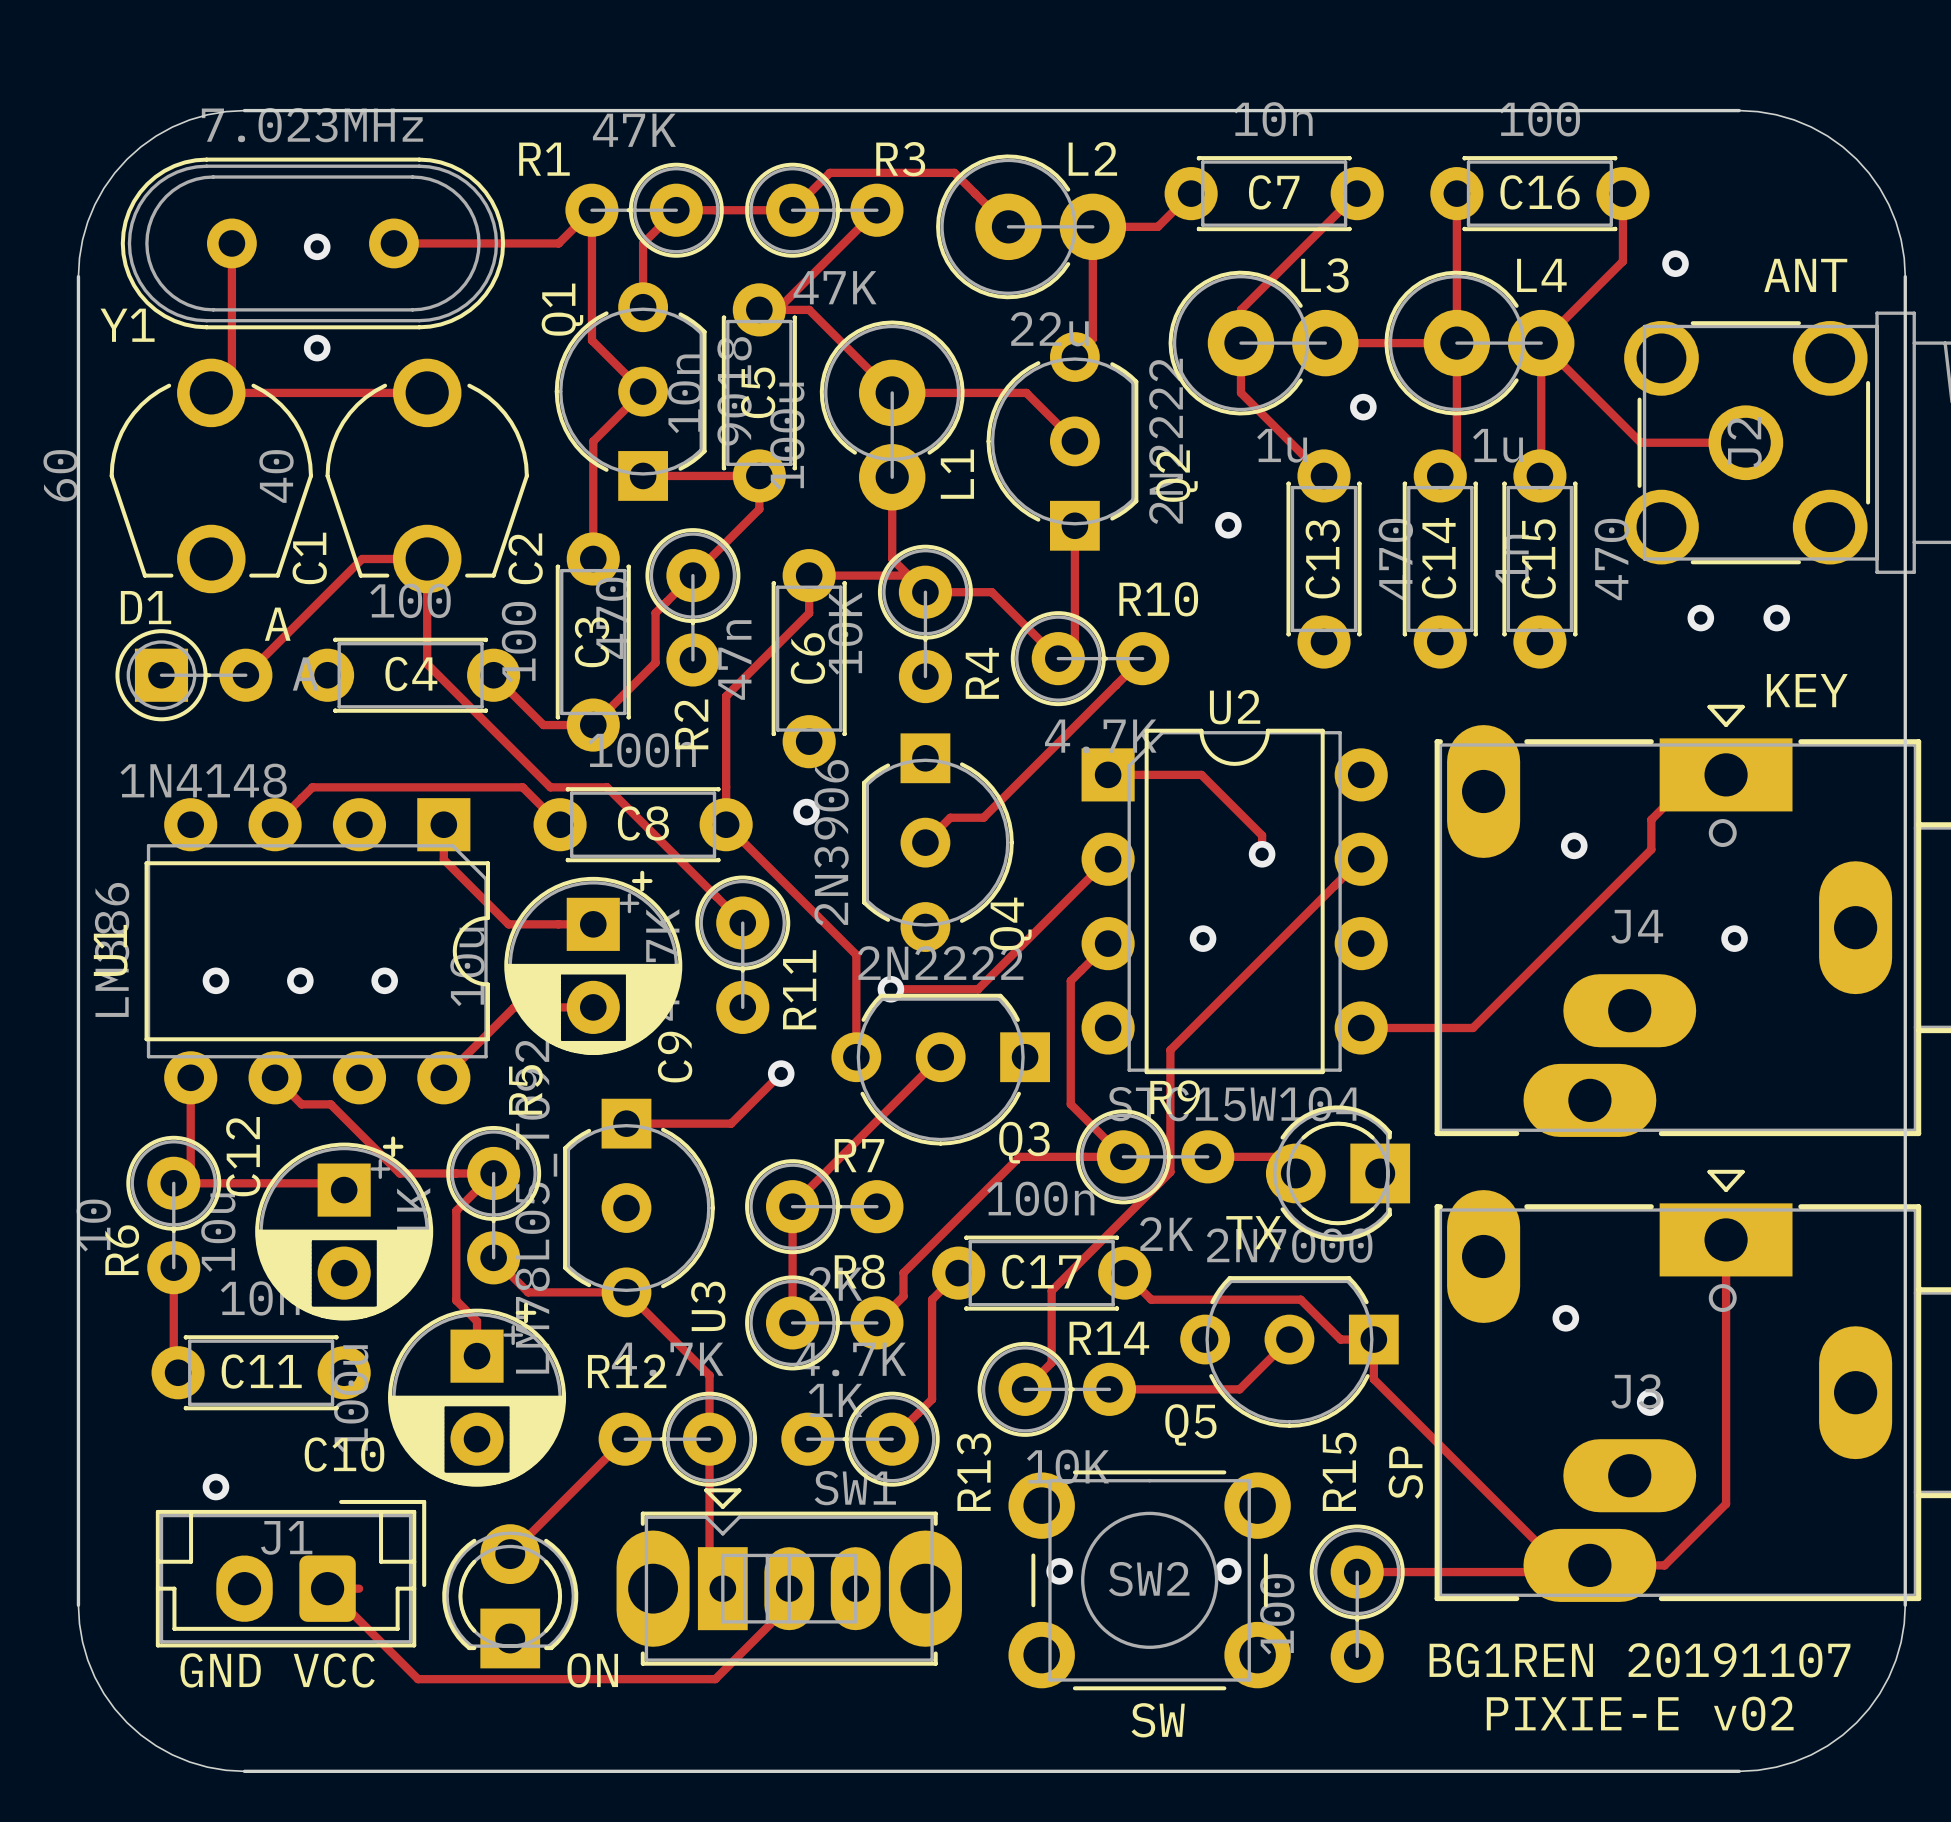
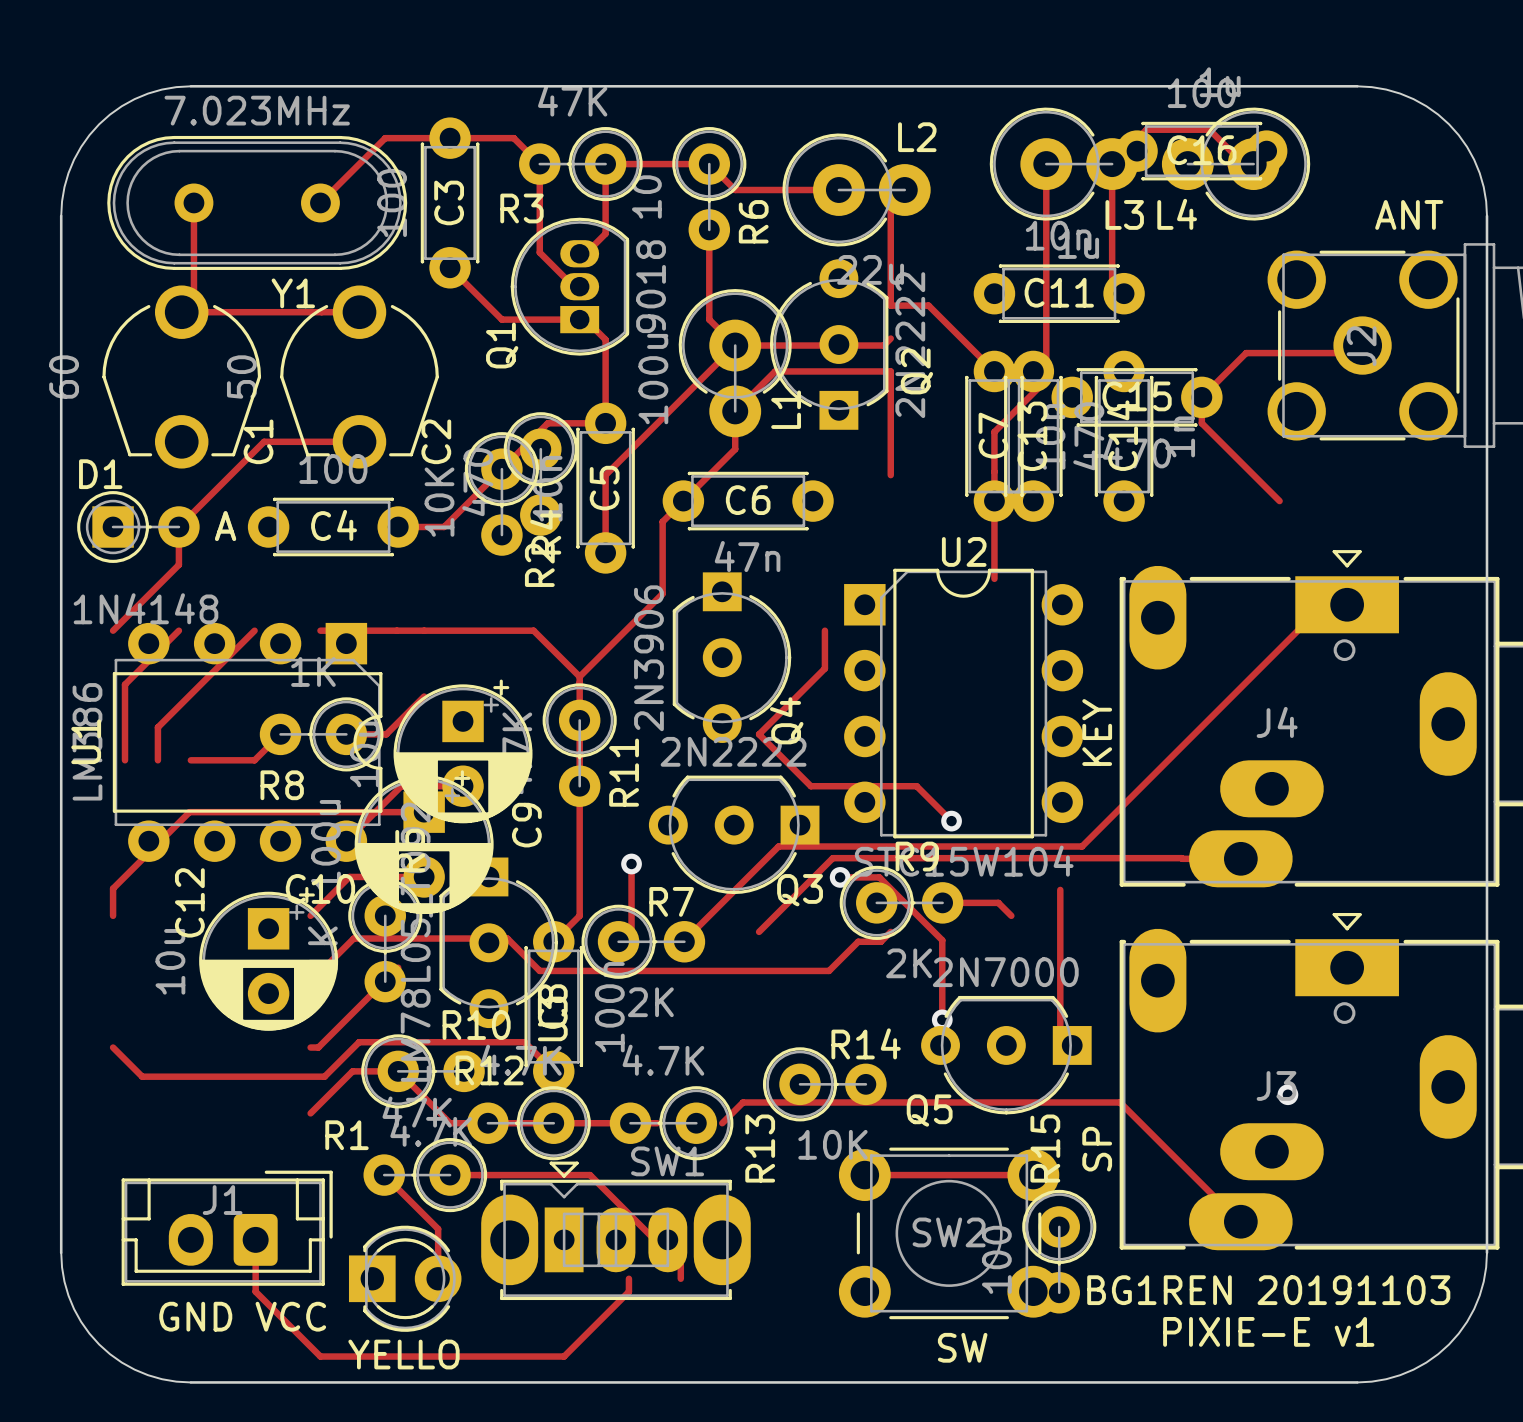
L2 name position: L2 (1092, 158) -> L2 (917, 137)
track: (1191, 193) (1157, 226) (1092, 226) (1092, 339) (1074, 357) -> none
C7 rotation: 0° (1274, 193) -> 90° clockwise (994, 436)
C7 position: (1274, 193) -> (994, 436)
track: (1357, 193) (1240, 309) (1240, 392) (1324, 475) -> none
track: (1456, 193) (1456, 459) (1440, 475) -> none
track: (1622, 193) (1622, 261) (1541, 343) -> none
R1 position: (644, 210) -> (425, 1175)
track: (775, 210) (676, 210) (643, 243) (643, 307) -> (605, 164) (605, 233) (585, 253) (579, 253)
track: (792, 210) (829, 172) (954, 172) (1008, 226) -> (618, 164) (709, 164) (735, 190) (838, 190)
R3 rotation: 0° (824, 210) -> 180° (580, 164)
track: (876, 210) (777, 309) -> none
track: none -> (1046, 164) (1046, 380) (994, 431) (994, 578)
track: none -> (1230, 165) (1235, 155) (1209, 129) (1146, 129) (1112, 164) (1112, 281) (1124, 293)
L2 position: (1031, 226) -> (856, 190)
track: (231, 243) (231, 372) (211, 392) (427, 392) -> none
Y1 position: (312, 243) -> (257, 202)
track: (393, 243) (558, 243) (591, 210) (591, 340) (643, 391) (593, 441) (593, 558) -> none
track: none -> (904, 190) (890, 204) (890, 305) (928, 305) (994, 371)
via: (317, 246) -> none
track: none -> (193, 202) (193, 299) (181, 312) (359, 312)
track: none -> (320, 202) (385, 138) (513, 138) (539, 164) (539, 252) (573, 286) (579, 286)
via: (1675, 263) -> none
L3 name position: L3 (1324, 275) -> L3 (1124, 214)
Q1 footprint: [554, 282, 707, 501] -> [510, 217, 630, 356]
track: none -> (709, 229) (709, 319) (735, 345)
Q1 name position: Q1 (562, 309) -> Q1 (502, 345)
track: (759, 309) (809, 309) (892, 392) (1026, 392) (1074, 441) -> none
Y1 name position: Y1 (127, 325) -> Y1 (293, 293)
track: none -> (450, 267) (501, 319) (585, 319) (605, 339) (605, 423) (547, 423) (444, 527) (398, 527)
L3 position: (1263, 343) -> (1063, 164)
track: (1325, 343) (1456, 343) -> none
L4 rotation: 0° (1479, 343) -> 180° (1236, 164)
L4 position: (1479, 343) -> (1236, 164)
track: (1541, 343) (1640, 442) (1745, 442) -> none
track: (1541, 343) (1539, 475) -> none
via: (317, 348) -> none
C5 position: (759, 392) -> (605, 488)
via: (1363, 407) -> none
L1 position: (892, 415) -> (735, 363)
track: none -> (890, 338) (883, 345) (735, 345)
track: none -> (735, 345) (605, 475) (605, 552)
track: none -> (1361, 353) (1246, 353) (1201, 397) (1201, 423) (1279, 501)
C1 position: (211, 475) -> (181, 377)
C2 position: (427, 475) -> (359, 377)
track: (643, 475) (759, 475) (759, 509) (655, 612) (655, 662) (593, 725) (543, 725) (493, 675) -> none
C2 value: 40 (276, 476) -> 50 (241, 377)
track: (892, 477) (892, 558) (925, 592) (991, 592) (1058, 658) (1074, 642) (1074, 525) -> none
via: (1228, 525) -> none
C15 rotation: 0° (1539, 558) -> 90° clockwise (1137, 397)
track: none -> (359, 441) (264, 441) (178, 527) (178, 564) (113, 630)
track: (908, 575) (809, 575) (809, 613) (726, 696) (726, 824) (856, 954) (856, 1057) -> none
track: none -> (890, 475) (890, 371) (775, 371) (735, 411) (735, 449) (662, 521) (662, 593) (579, 676)
via: (1700, 618) -> none
via: (1776, 618) -> none
R4 position: (925, 623) -> (501, 493)
D1 footprint: [115, 629, 273, 722] -> [77, 491, 200, 563]
C3 position: (593, 642) -> (450, 202)
C6 rotation: 0° (809, 658) -> 90° clockwise (748, 501)
C6 position: (809, 658) -> (748, 501)
R10 position: (1090, 658) -> (422, 1071)
track: (1142, 658) (983, 817) (950, 817) (925, 842) -> none
C6 value position: 47n (734, 660) -> 47n (747, 556)
track: (245, 675) (362, 558) (427, 558) (427, 664) (550, 787) (607, 787) (742, 923) -> none
C4 position: (410, 675) -> (333, 527)
J4 value rotation: 0° (1807, 690) -> 90° counterclockwise (1097, 732)
J4 value position: KEY (1807, 690) -> KEY (1097, 732)
track: (1108, 774) (1201, 774) (1262, 835) (1262, 854) -> none
track: none -> (178, 630) (125, 684) (125, 760)
track: none -> (254, 630) (157, 727) (157, 760)
track: none -> (320, 630) (533, 630) (579, 676)
track: none -> (824, 630) (824, 668) (759, 734) (810, 786) (916, 786) (951, 821)
via: (806, 812) -> none
track: (1651, 819) (1651, 849) (1472, 1027) (1361, 1027) -> (1288, 639) (1082, 846) (778, 846) (693, 931)
track: (275, 824) (312, 787) (522, 787) (560, 824) -> none
track: (443, 824) (443, 859) (508, 924) (593, 924) -> none
C8 rotation: 0° (643, 824) -> 90° clockwise (553, 1006)
C8 position: (643, 824) -> (553, 1006)
via: (1574, 845) -> none
via: (1262, 854) -> none
track: (1108, 859) (978, 989) (890, 989) -> none
track: (1361, 859) (1170, 1050) (1170, 1172) (1051, 1290) (1051, 1362) (1025, 1389) -> none
track: none -> (579, 676) (579, 915) (553, 941)
track: none -> (424, 696) (386, 734) (346, 734)
via: (1203, 938) -> none
via: (1734, 938) -> none
track: none -> (280, 734) (254, 760) (190, 760)
track: (1108, 943) (1070, 980) (1070, 1104) (1123, 1156) (1019, 1156) (903, 1272) (903, 1296) (876, 1322) -> none
via: (215, 980) -> none
via: (300, 980) -> none
via: (384, 980) -> none
via: (890, 989) -> none
track: none -> (424, 812) (189, 812) (113, 888) (113, 915)
via: none -> (951, 821)
track: (940, 1057) (792, 1205) (792, 1322) -> none
track: (781, 1073) (731, 1123) (626, 1123) -> none
via position: (781, 1073) -> (631, 864)
track: (190, 1077) (190, 1166) (173, 1183) (337, 1183) (344, 1190) -> none
track: (275, 1077) (301, 1104) (330, 1104) (399, 1173) (493, 1173) (456, 1210) (456, 1300) (477, 1321) (477, 1356) -> none
track: none -> (1240, 858) (832, 858) (759, 931)
track: none -> (631, 864) (631, 941)
track: none -> (424, 876) (349, 876) (310, 915)
track: none -> (840, 877) (879, 877) (942, 940) (942, 1019)
via: none -> (840, 877)
track: none -> (1060, 889) (1060, 1045)
part: (1338, 1173) -> none
track: none -> (890, 931) (880, 941) (858, 941) (829, 970) (539, 970) (507, 938) (353, 938) (310, 981)
R6 position: (173, 1215) -> (709, 188)
track: none -> (398, 967) (318, 1047) (310, 1047)
track: (1726, 1239) (1726, 1503) (1664, 1565) (1560, 1565) (1373, 1379) (1373, 1339) (1340, 1339) (1300, 1299) (1151, 1299) (1124, 1273) -> none
R6 name position: R6 (122, 1250) -> R6 (753, 221)
track: (493, 1257) (528, 1292) (626, 1292) (709, 1375) (709, 1575) (722, 1588) -> none
track: (173, 1267) (173, 1368) (178, 1372) -> none
track: (958, 1273) (932, 1299) (932, 1399) (892, 1439) -> none
C17: 100n (1041, 1273) -> none
via: none -> (942, 1019)
via: (1565, 1318) -> none
R8 rotation: 0° (824, 1322) -> 180° (321, 734)
R8 position: (824, 1322) -> (321, 734)
track: (1289, 1339) (1239, 1389) (1109, 1389) -> none
track: none -> (113, 1047) (142, 1076) (324, 1076) (359, 1042) (524, 1042) (553, 1071)
C11 position: (261, 1372) -> (1059, 293)
C10 position: (477, 1394) -> (424, 842)
track: none -> (310, 1113) (352, 1071) (398, 1071) (450, 1123) (657, 1123)
track: (625, 1439) (510, 1554) -> none
track: none -> (722, 1123) (743, 1102) (1120, 1102) (1228, 1210)
via: (215, 1487) -> none
track: none -> (384, 1175) (438, 1228) (438, 1278)
track: none -> (450, 1175) (590, 1175) (680, 1265) (680, 1278)
track: none -> (864, 1175) (1033, 1175)
track: (1589, 1565) (1583, 1572) (1357, 1572) -> none
via: (1059, 1571) -> none
via: (1228, 1571) -> none
SW2 position: (1149, 1580) -> (949, 1233)
track: none -> (255, 1239) (255, 1291) (320, 1356) (564, 1356) (628, 1291) (628, 1278)
track: (359, 1588) (327, 1588) (418, 1679) (715, 1679) (789, 1605) (789, 1588) -> none
part: (510, 1596) -> none
part: none -> YELLO (405, 1278)
text: BG1REN 20191107 (1640, 1660) -> BG1REN 20191103 (1268, 1290)
text position: GND VCC (277, 1670) -> GND VCC (242, 1316)
text: PIXIE-E v02 (1640, 1713) -> PIXIE-E v1 (1268, 1331)
SW2 value position: SW (1158, 1720) -> SW (962, 1347)

